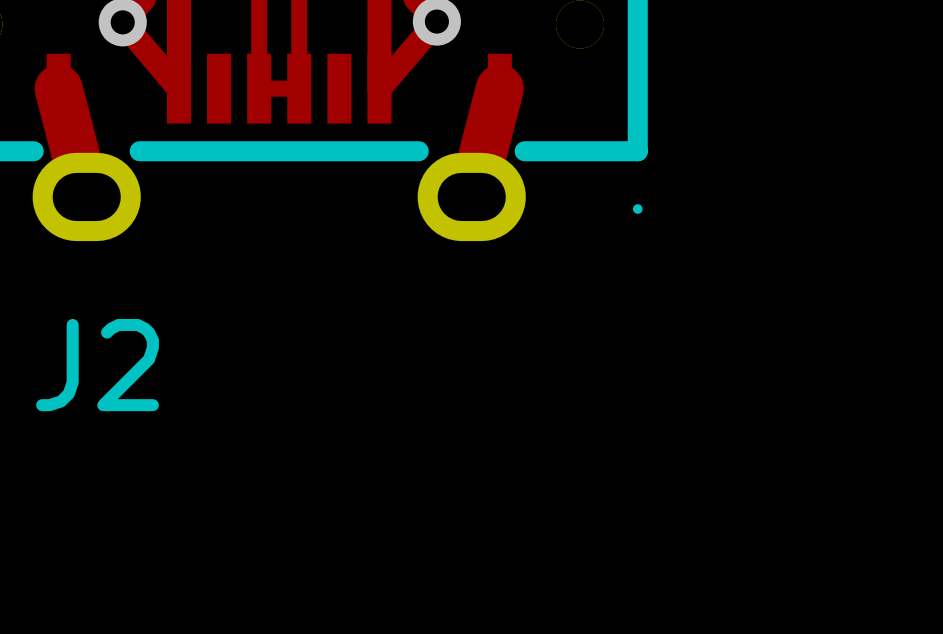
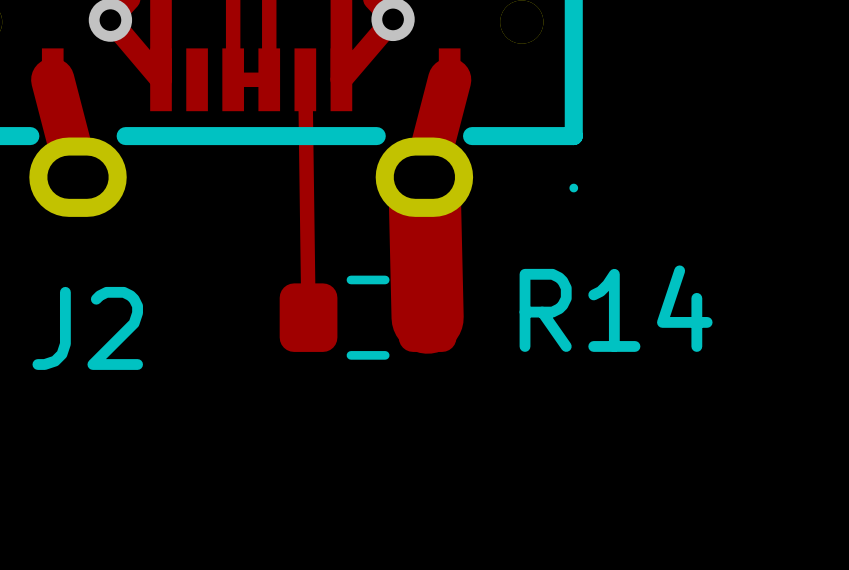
track: none -> (305, 79) (308, 317)
track: none -> (424, 177) (427, 317)
R14: none -> (368, 317)

